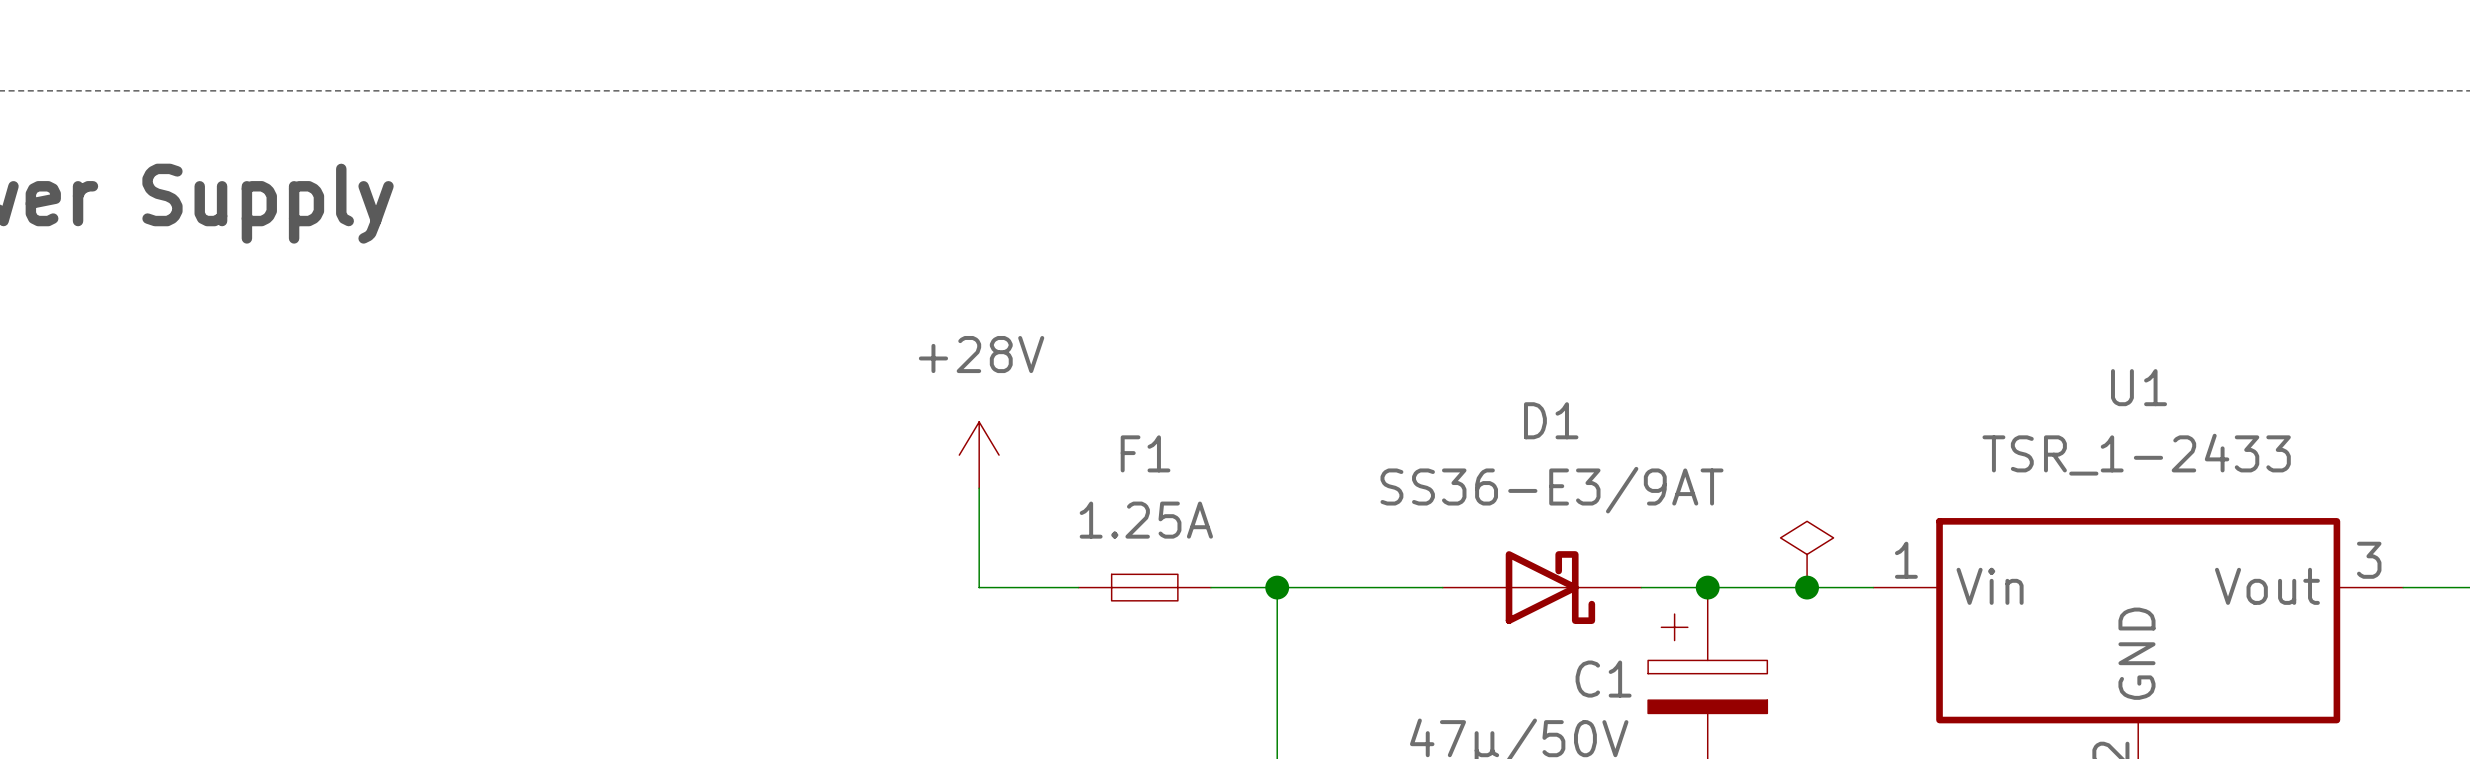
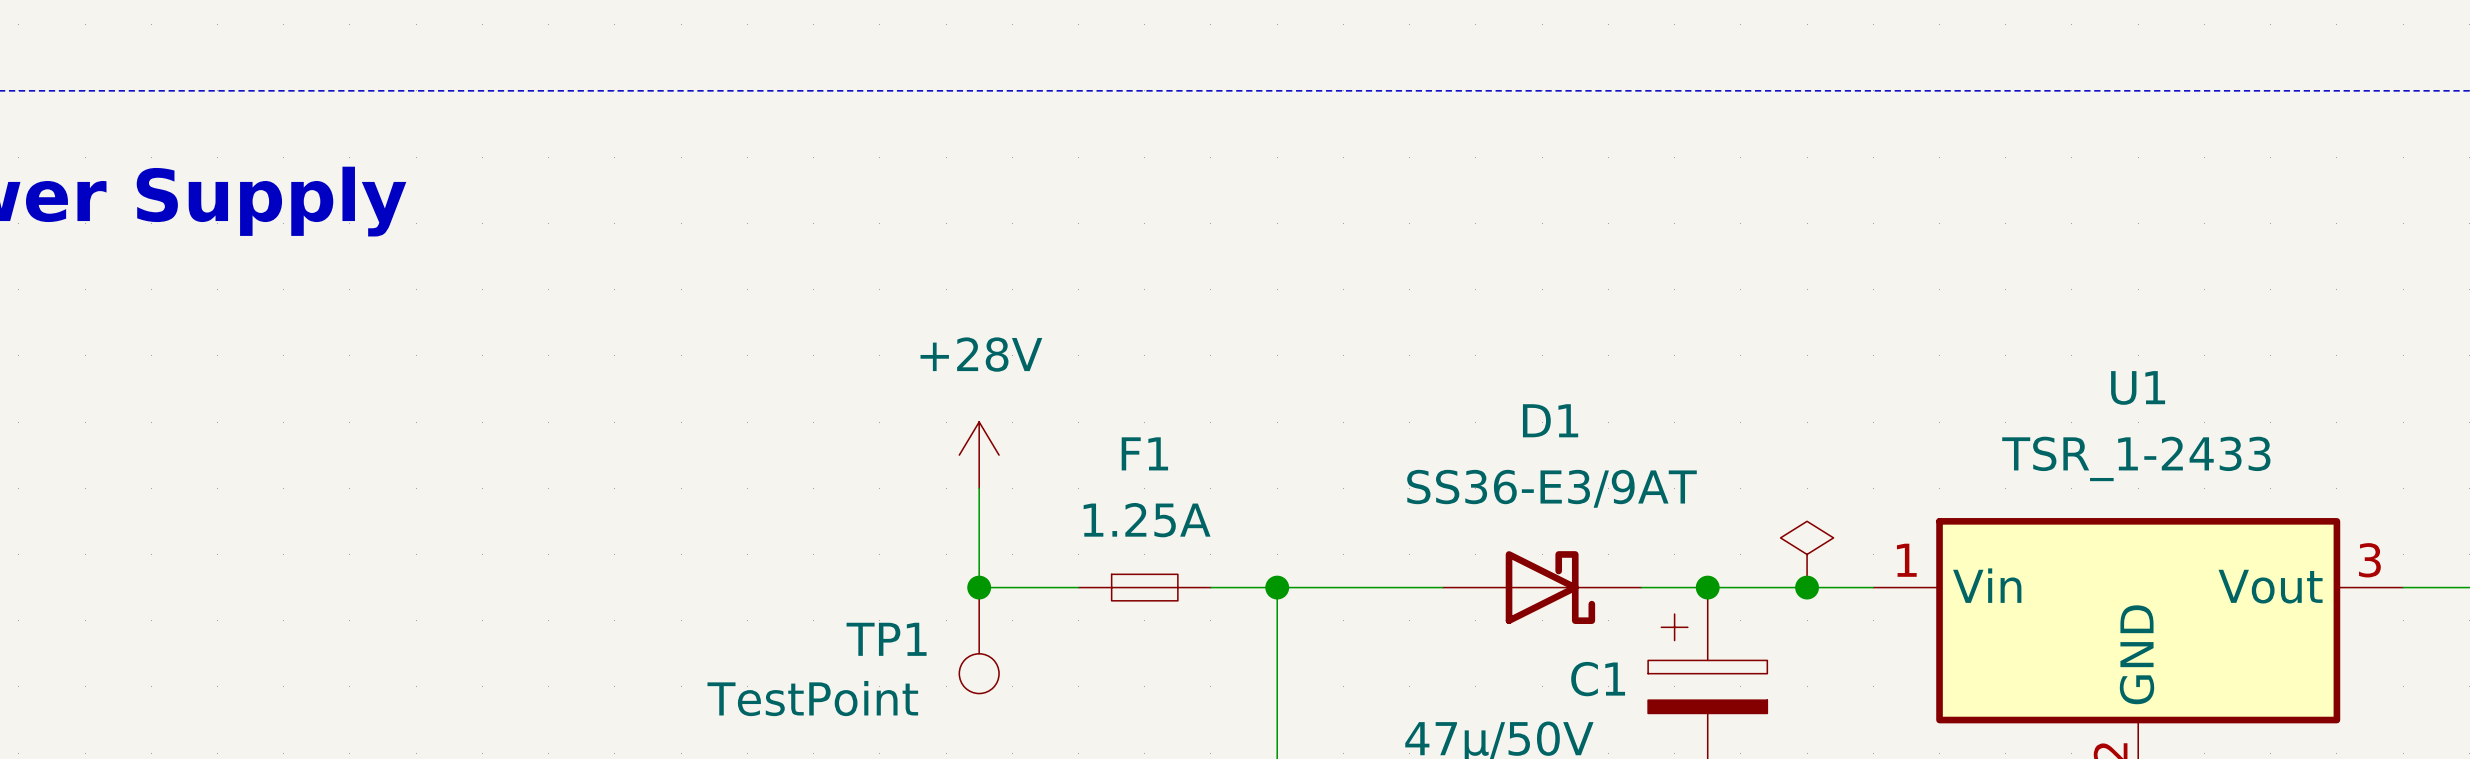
junction: none -> (979, 587)
TP1: none -> TestPoint (979, 640)

